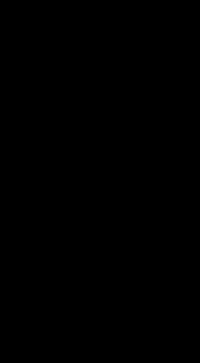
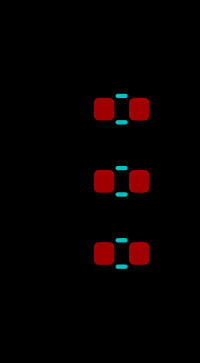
part: none -> (121, 109)
part: none -> (121, 181)
part: none -> (121, 253)

